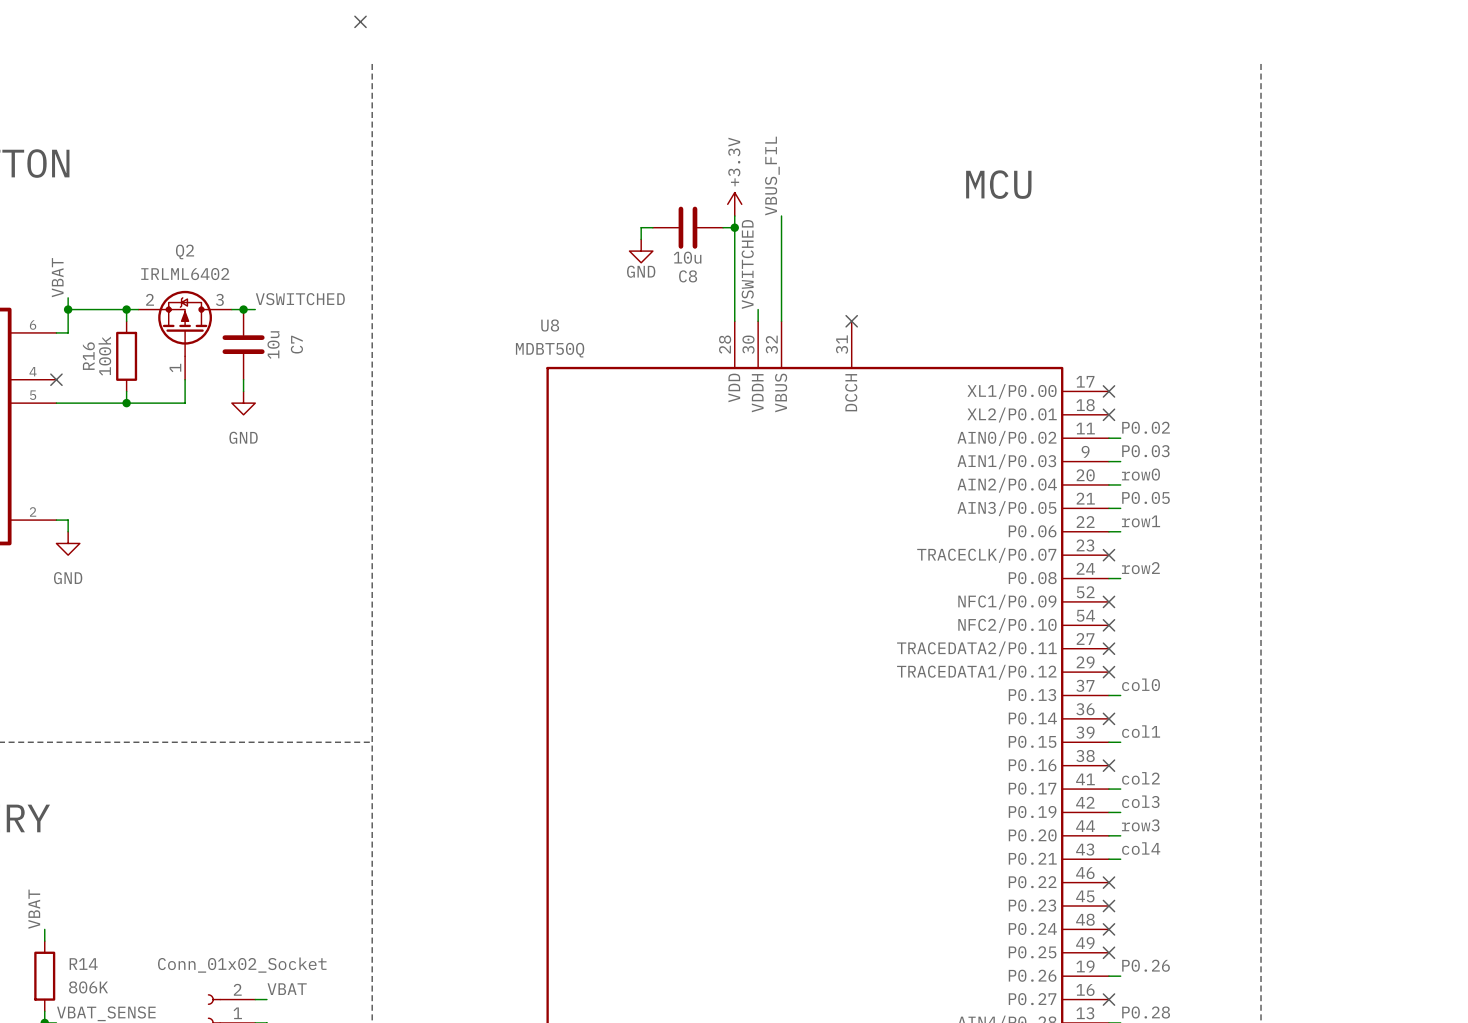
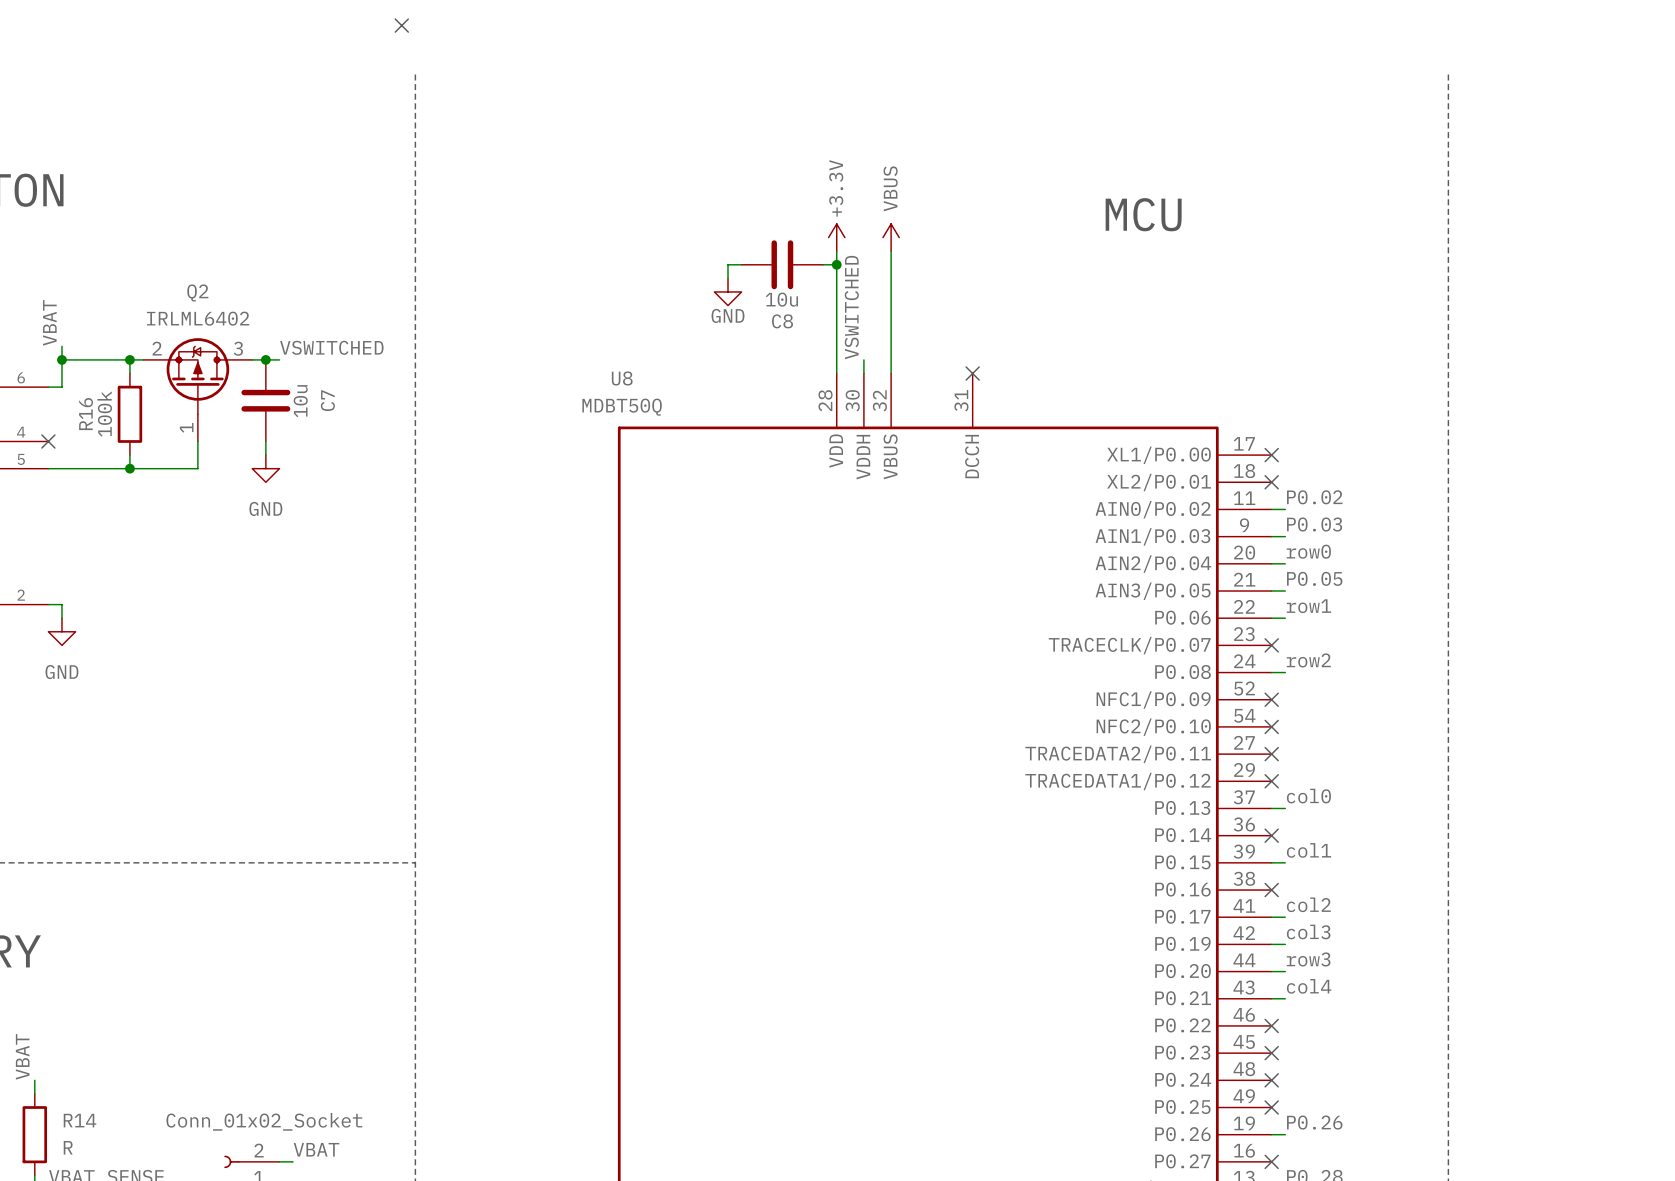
label: VBUS_FIL (772, 176) -> none
power symbol: none -> VBUS (891, 237)
R14 value: 806K (88, 987) -> R (68, 1147)

